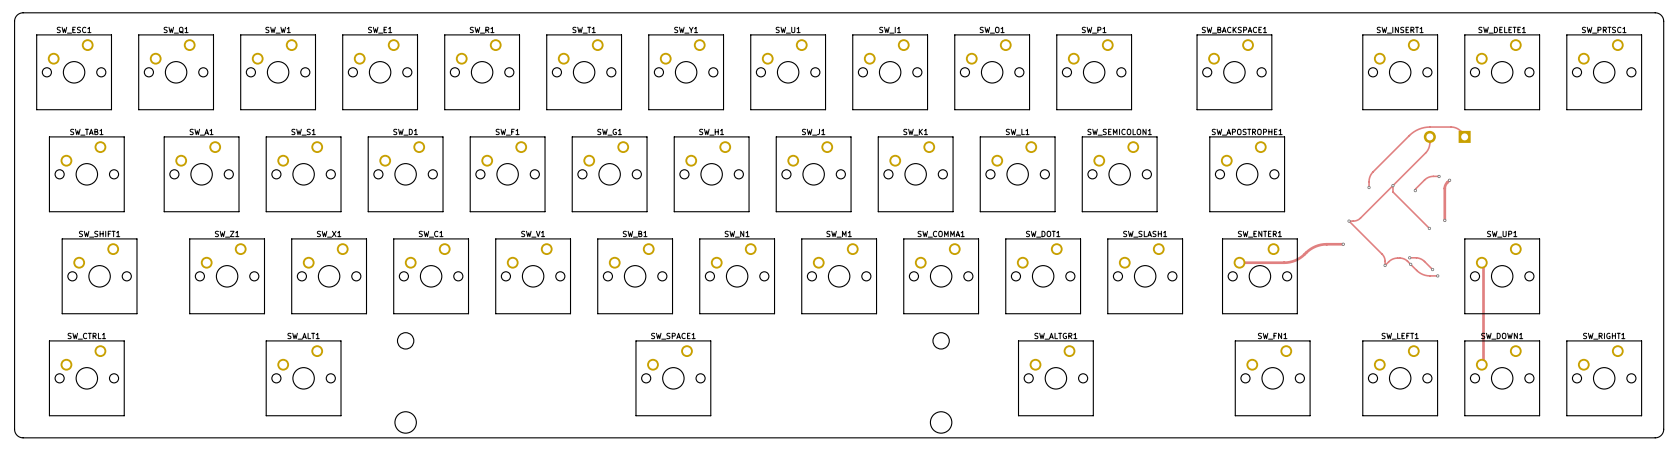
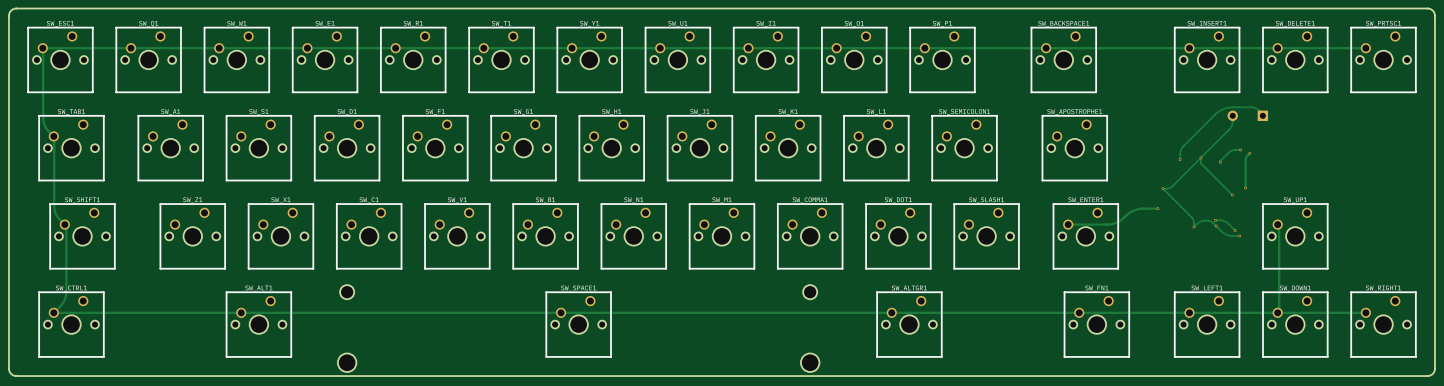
track: none -> (1365, 48) (42, 48) (43, 120) (46, 128) (54, 136) (54, 208) (57, 216) (66, 227) (66, 293) (62, 303) (53, 312)
track: none -> (53, 312) (1365, 312)

